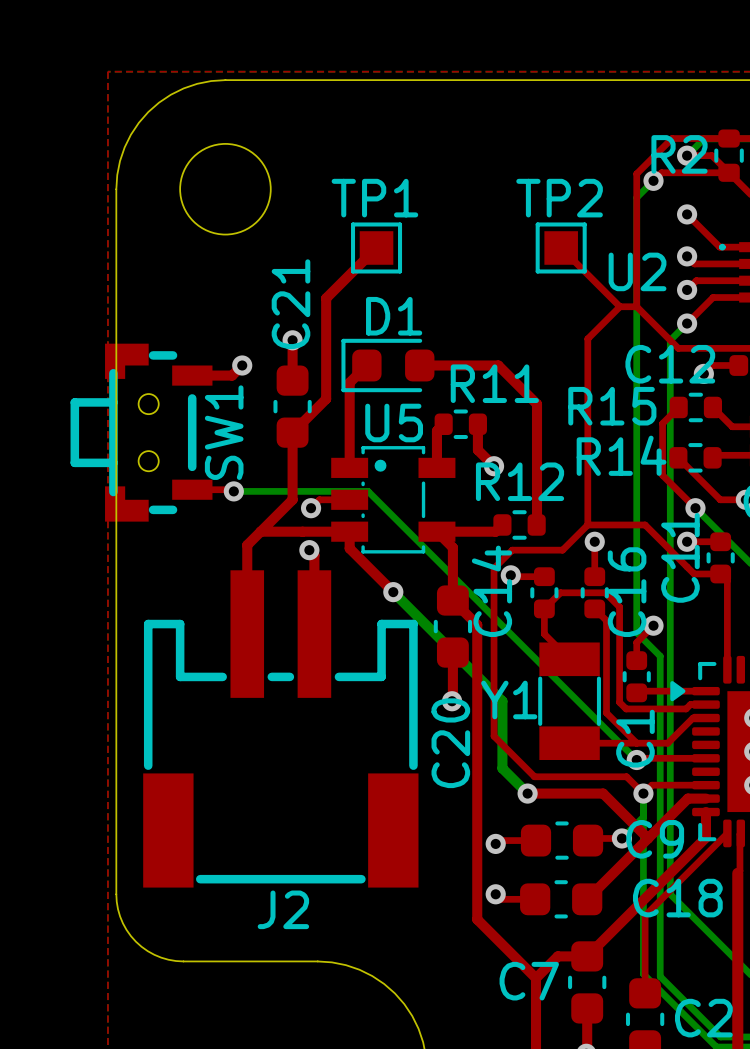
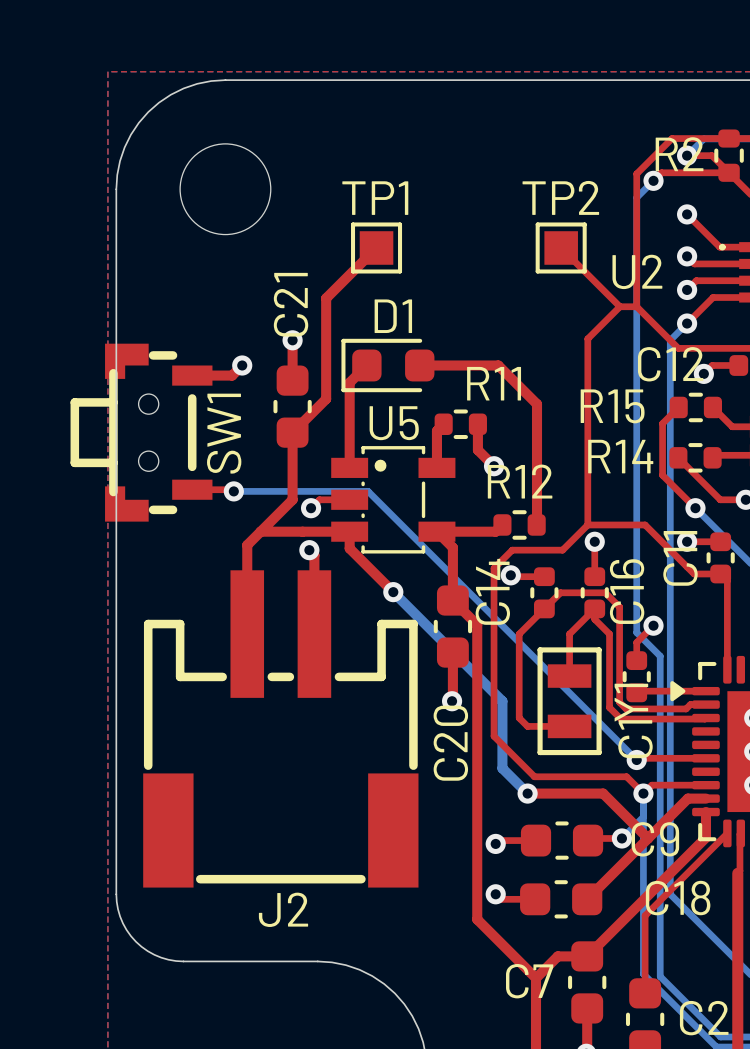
top track: (544, 608) (544, 634) (569, 659) -> (544, 608) (519, 634) (519, 718) (527, 726) (569, 726)
top track: (594, 608) (606, 620) (606, 712) (636, 743) -> none
Y1 footprint: [538, 642, 601, 760] -> [537, 647, 602, 756]
Y1 name position: Y1 (509, 699) -> Y1 (631, 702)
top track: (705, 718) (693, 718) (667, 743) (569, 743) -> (705, 718) (620, 719) (609, 707) (609, 634) (594, 619) (594, 608) (569, 634) (569, 676)

